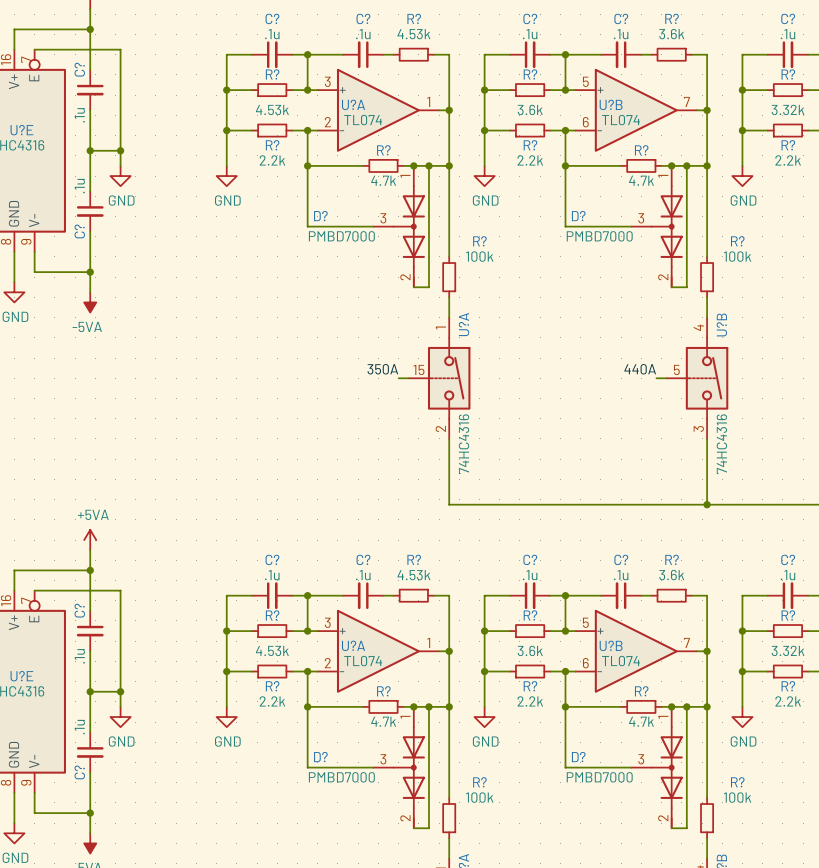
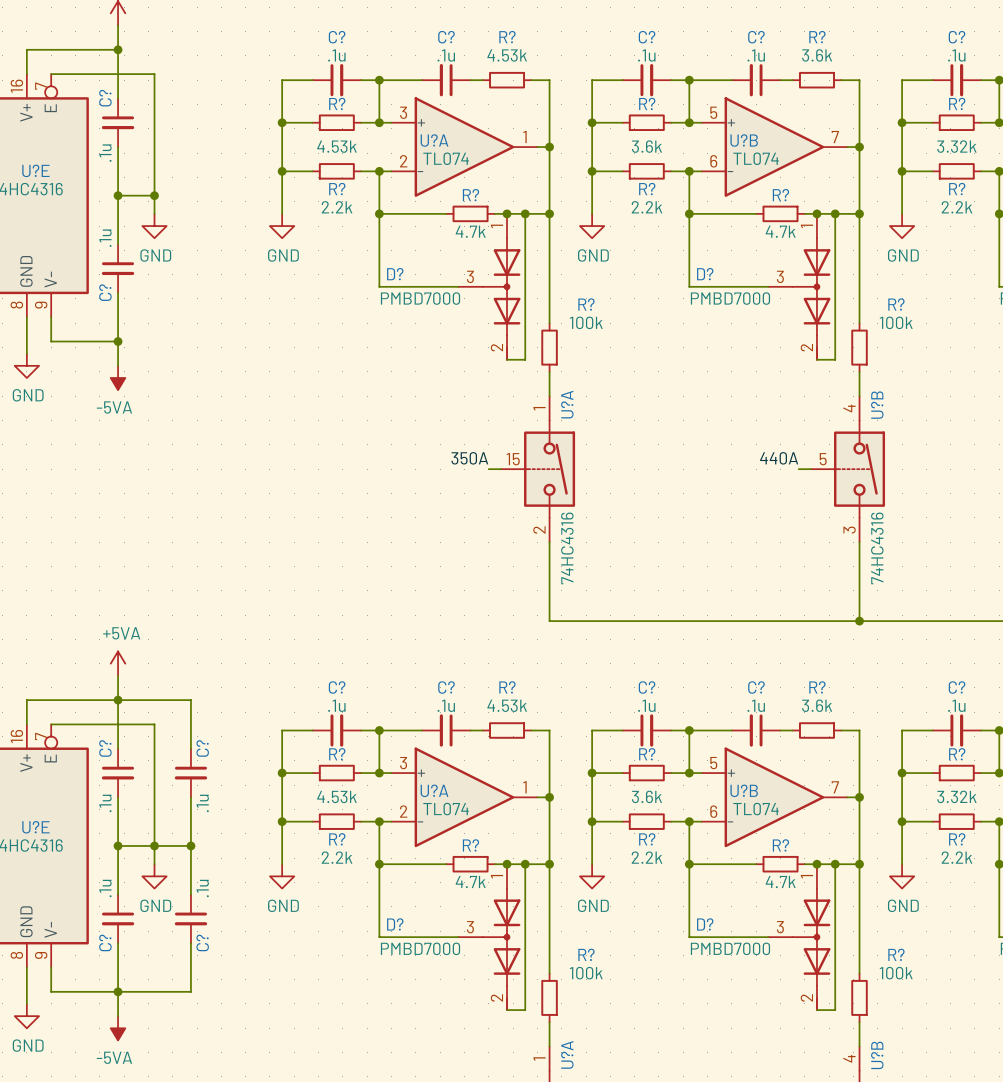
wire: none -> (118, 700) (190, 700) (190, 748)
C?: none -> .1u (190, 773)
wire: none -> (190, 797) (190, 894)
wire: none -> (154, 845) (190, 845)
junction: none -> (190, 845)
C?: none -> .1u (190, 918)
wire: none -> (190, 943) (190, 991) (118, 991)

